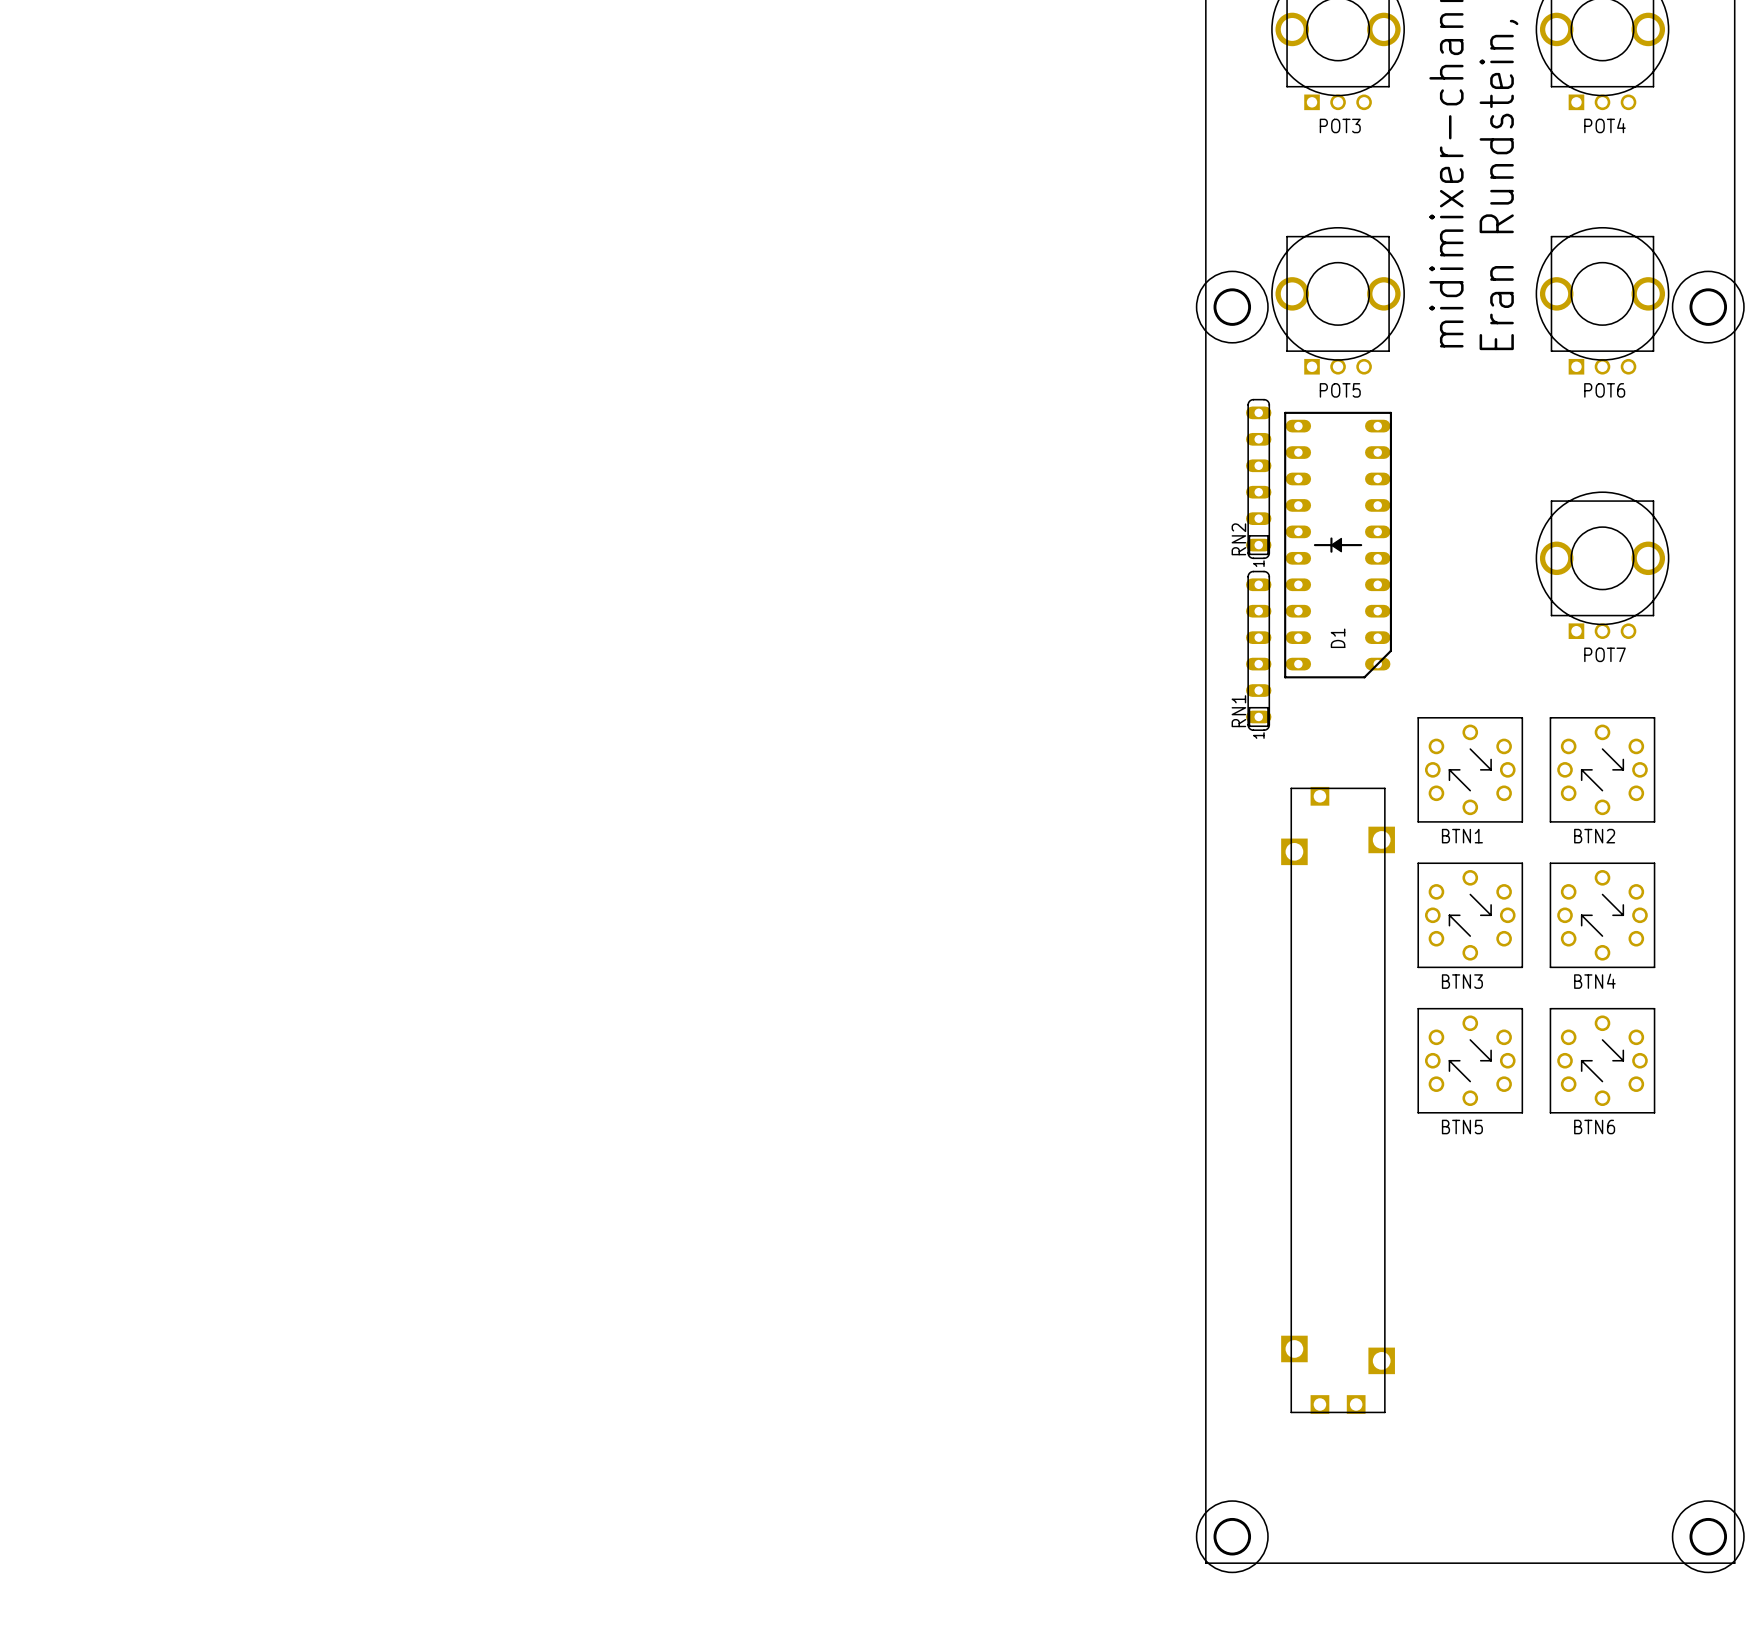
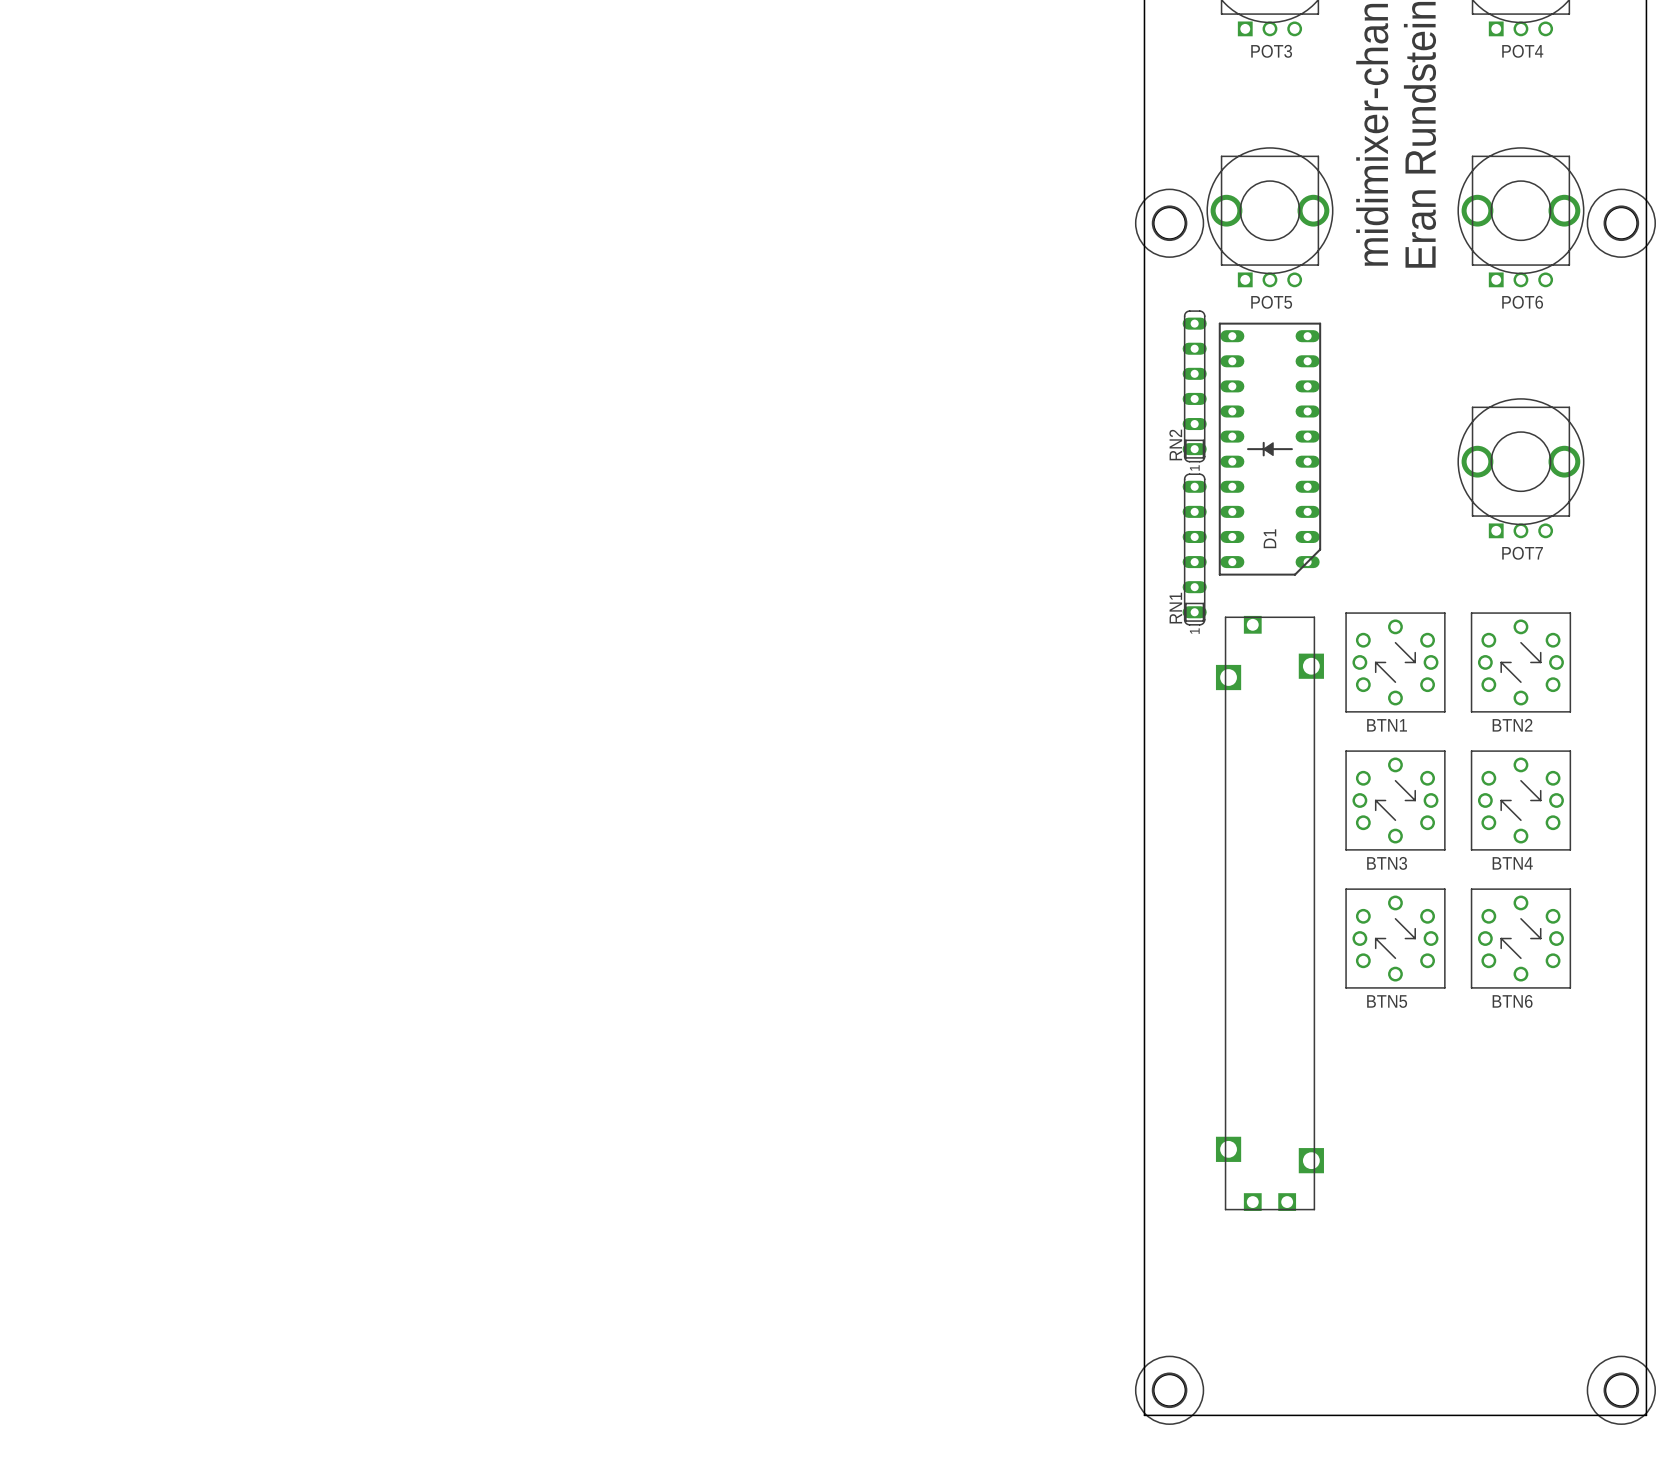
part position: (1338, 1100) -> (1269, 913)

